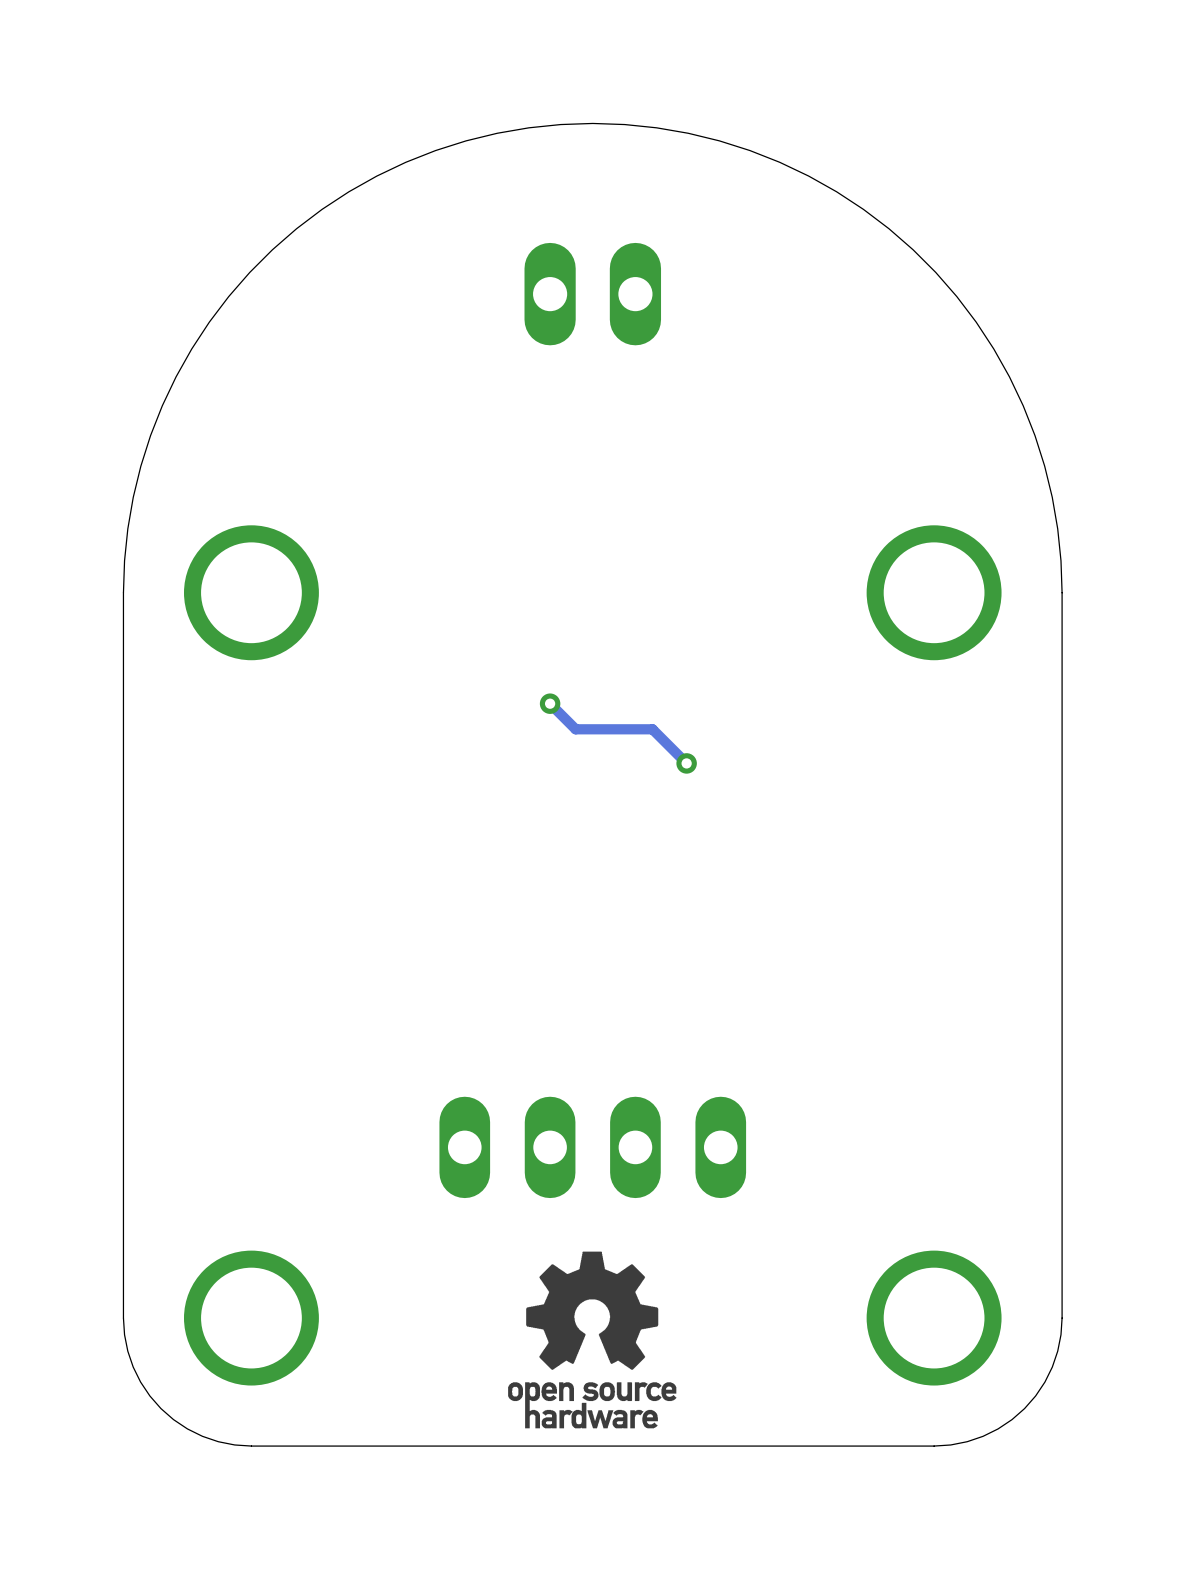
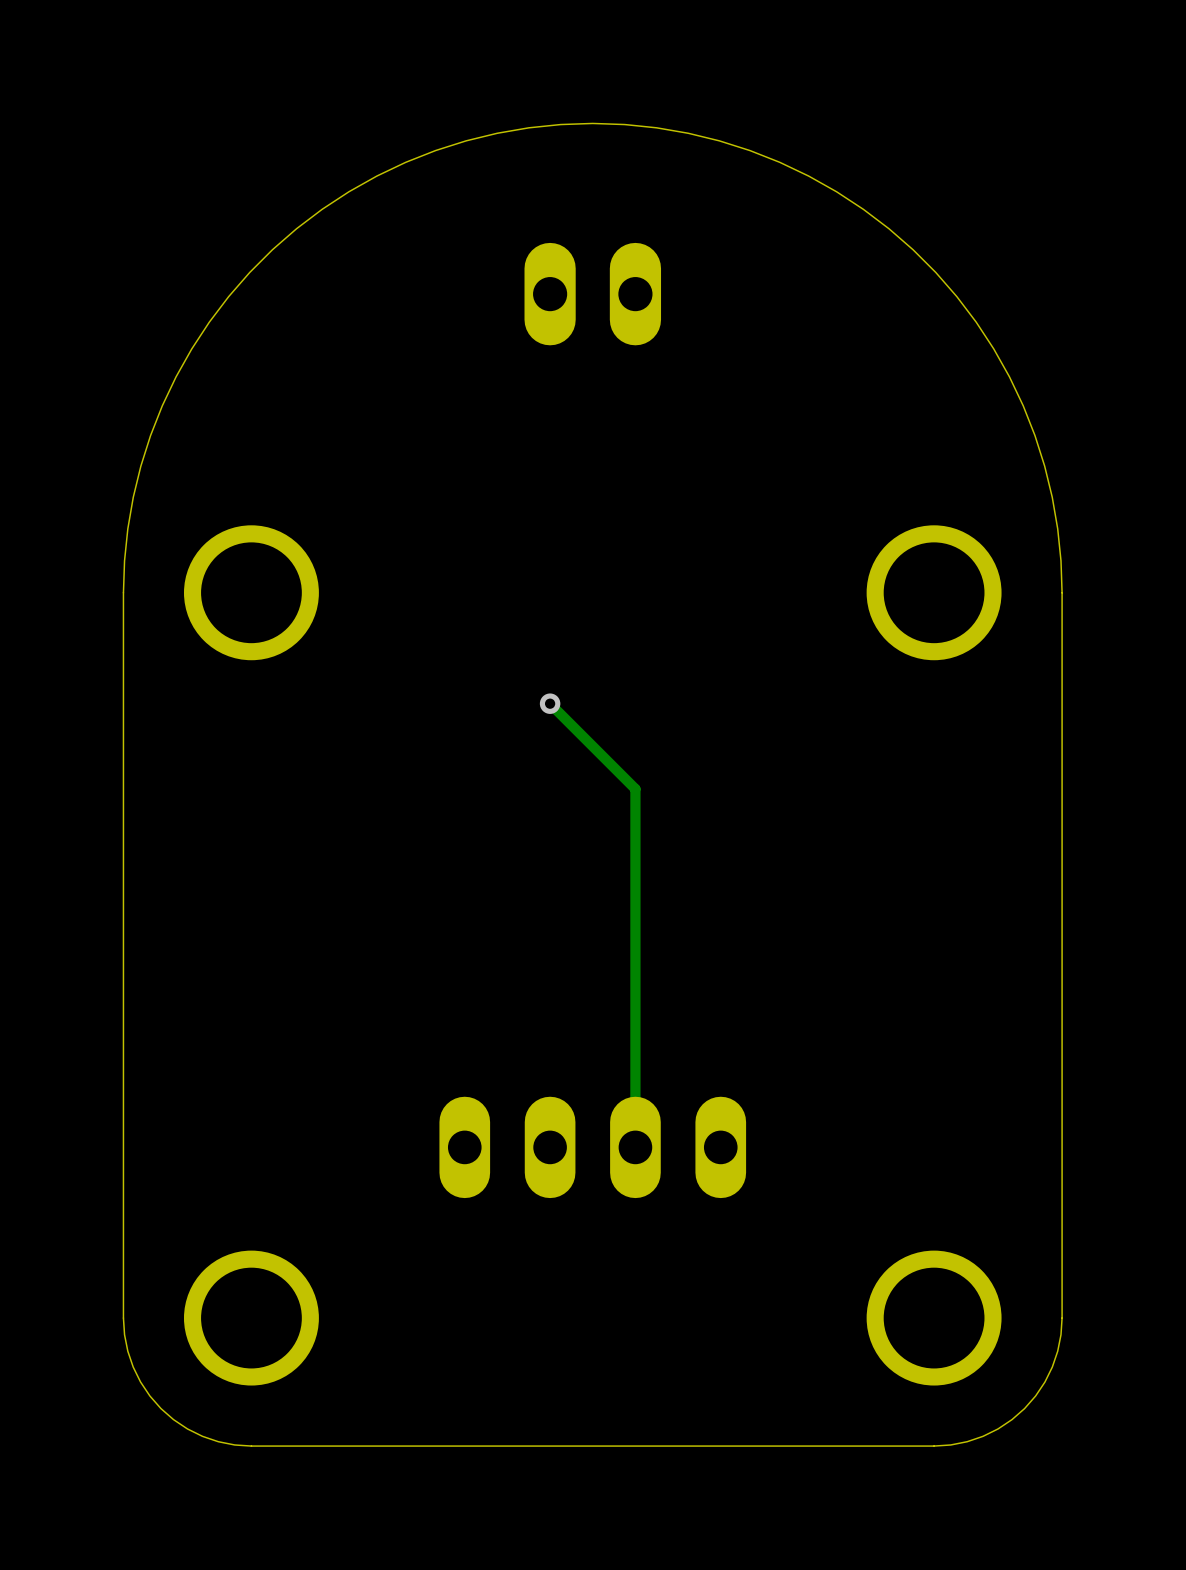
track: (575, 729) (652, 729) (686, 763) -> (575, 729) (635, 789) (635, 1147)
via: (686, 763) -> none
drawing: [508, 1251, 677, 1429] -> none

